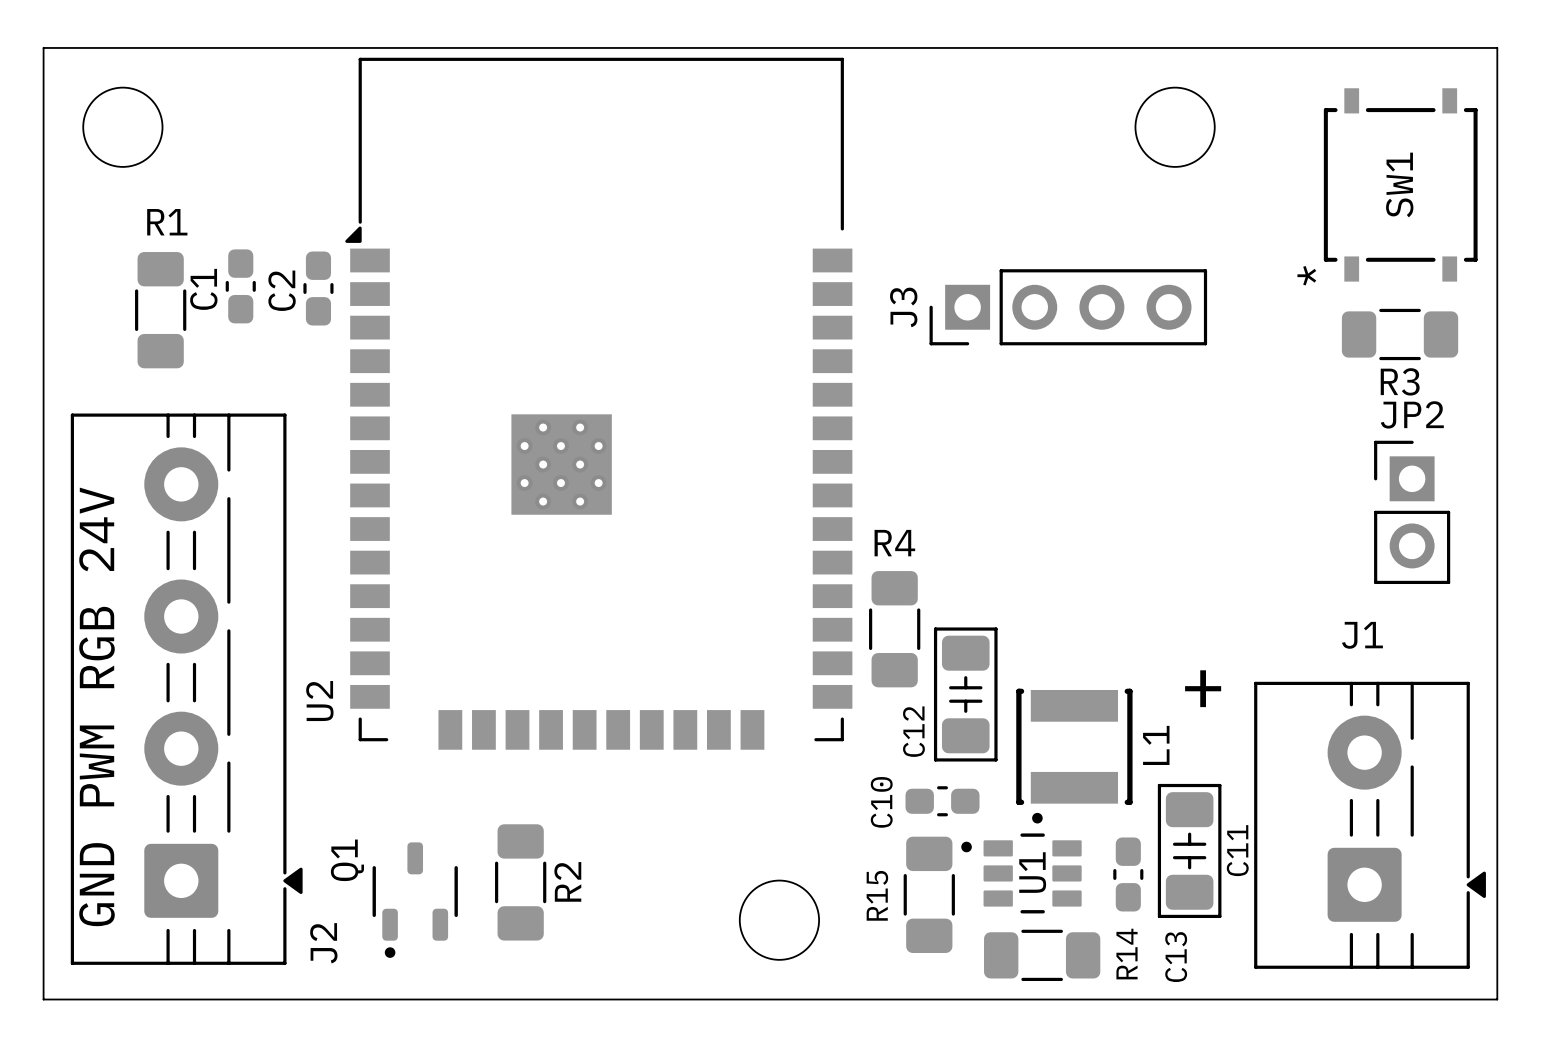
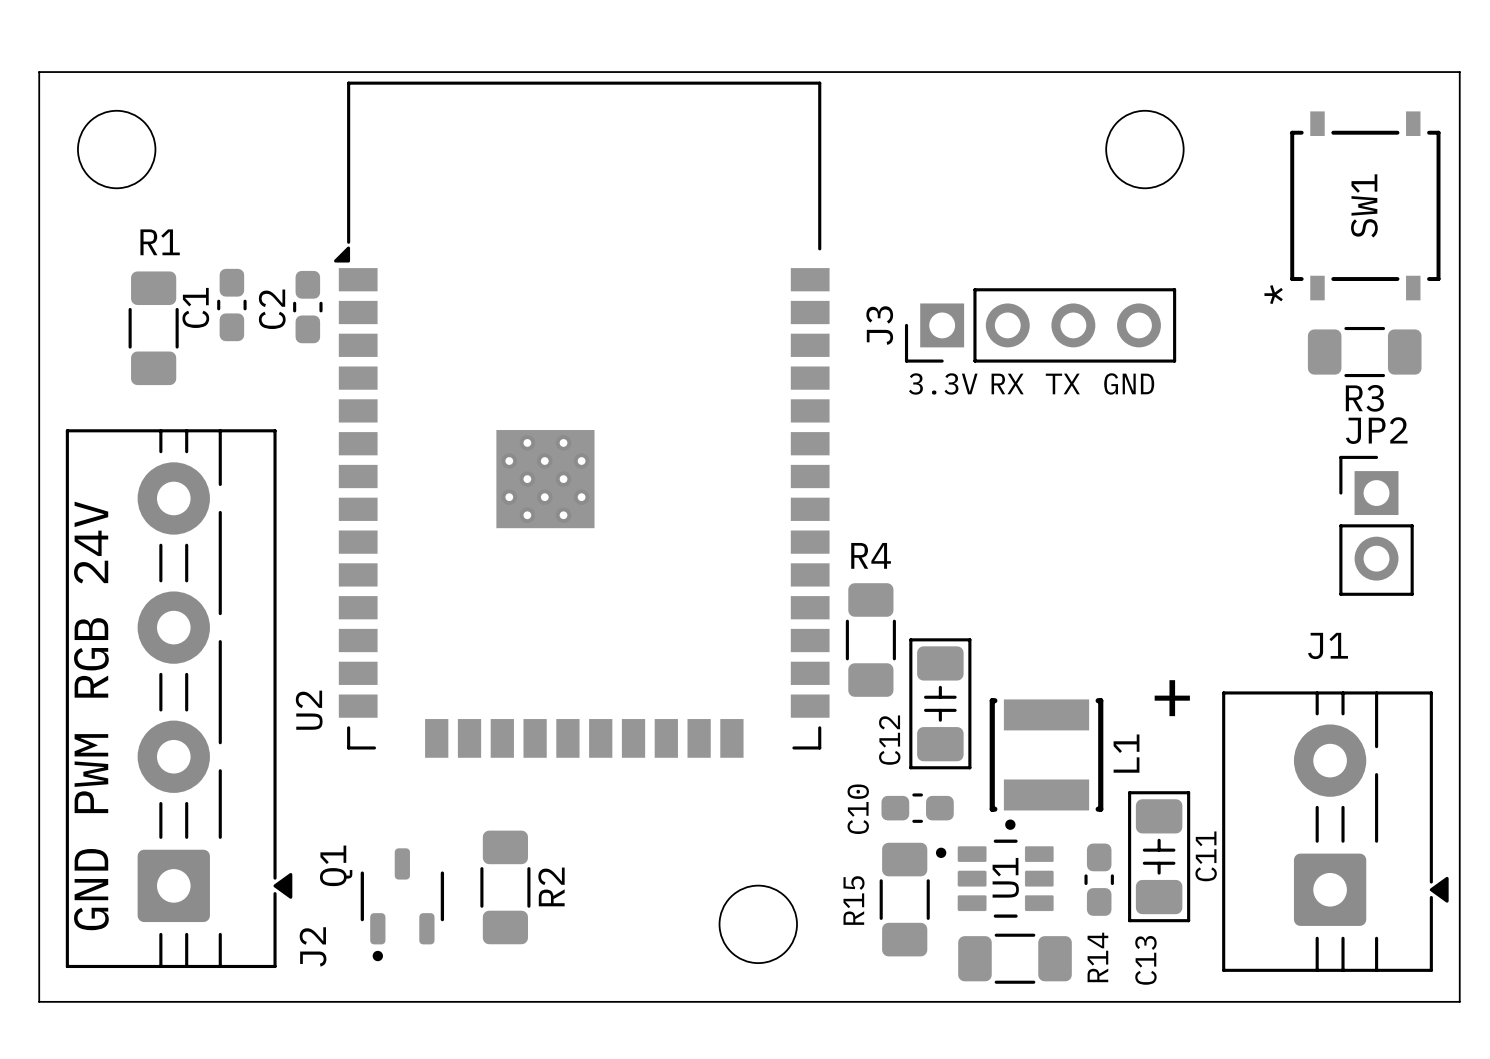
text: none -> 3.3V (943, 383)
text: none -> RX (1007, 383)
text: none -> TX (1062, 383)
text: none -> GND (1129, 383)

